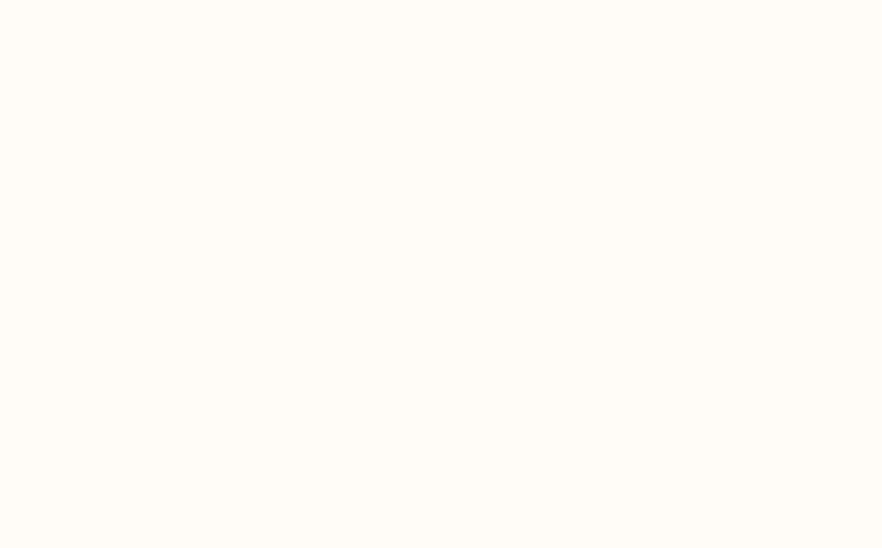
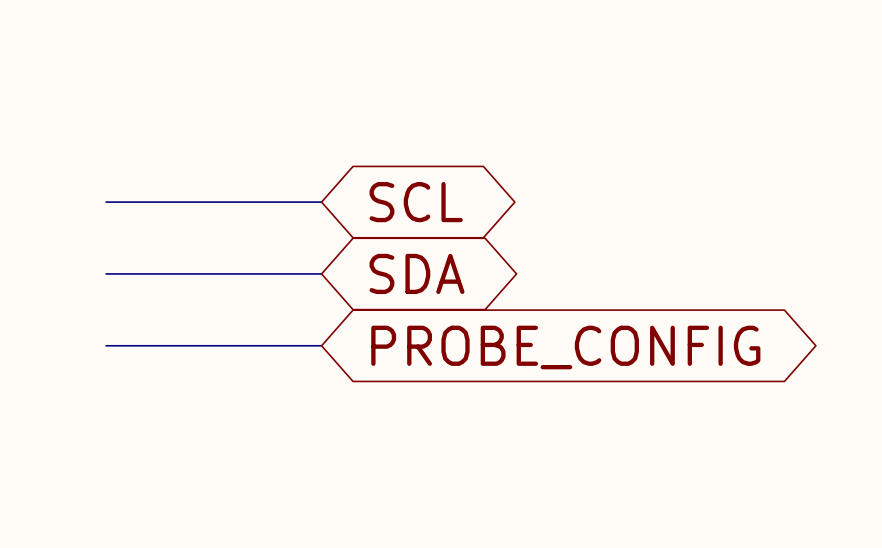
wire: none -> (106, 202) (321, 202)
global label: none -> SCL (416, 202)
wire: none -> (106, 273) (321, 273)
global label: none -> SDA (417, 273)
wire: none -> (106, 345) (321, 345)
global label: none -> PROBE_CONFIG (565, 347)

